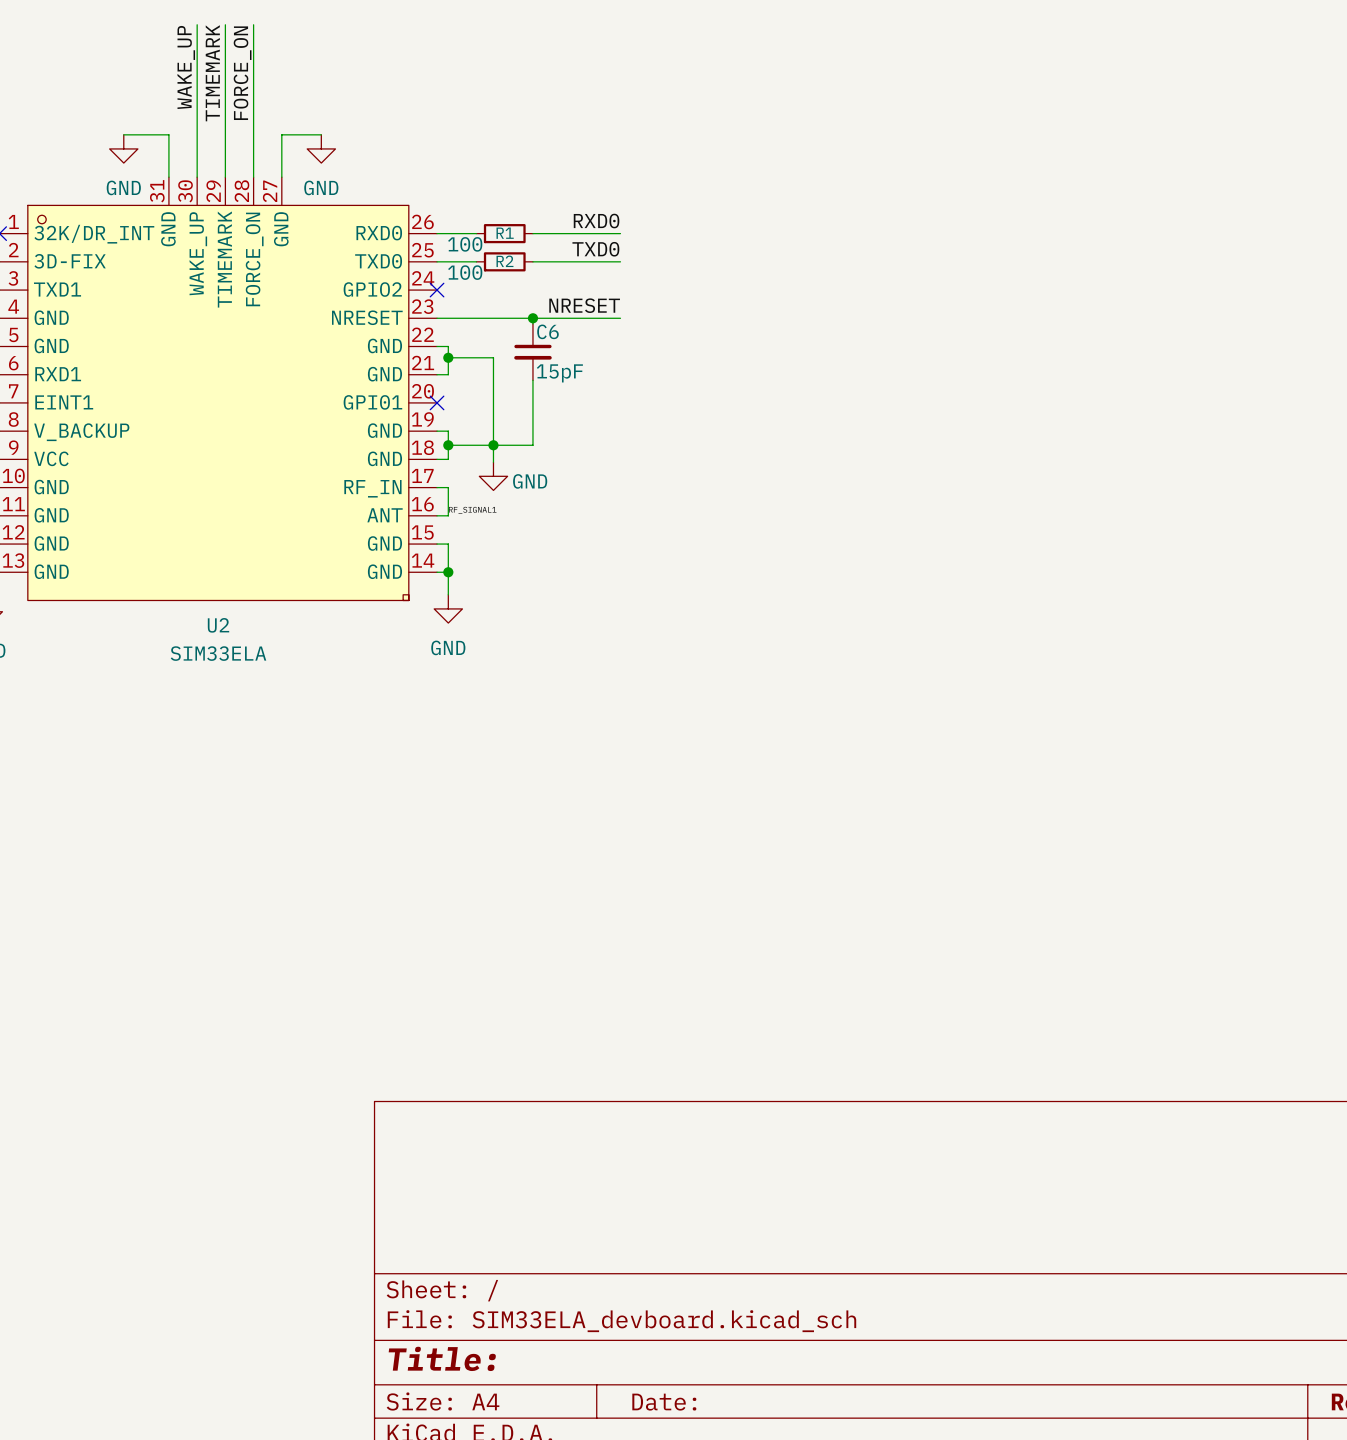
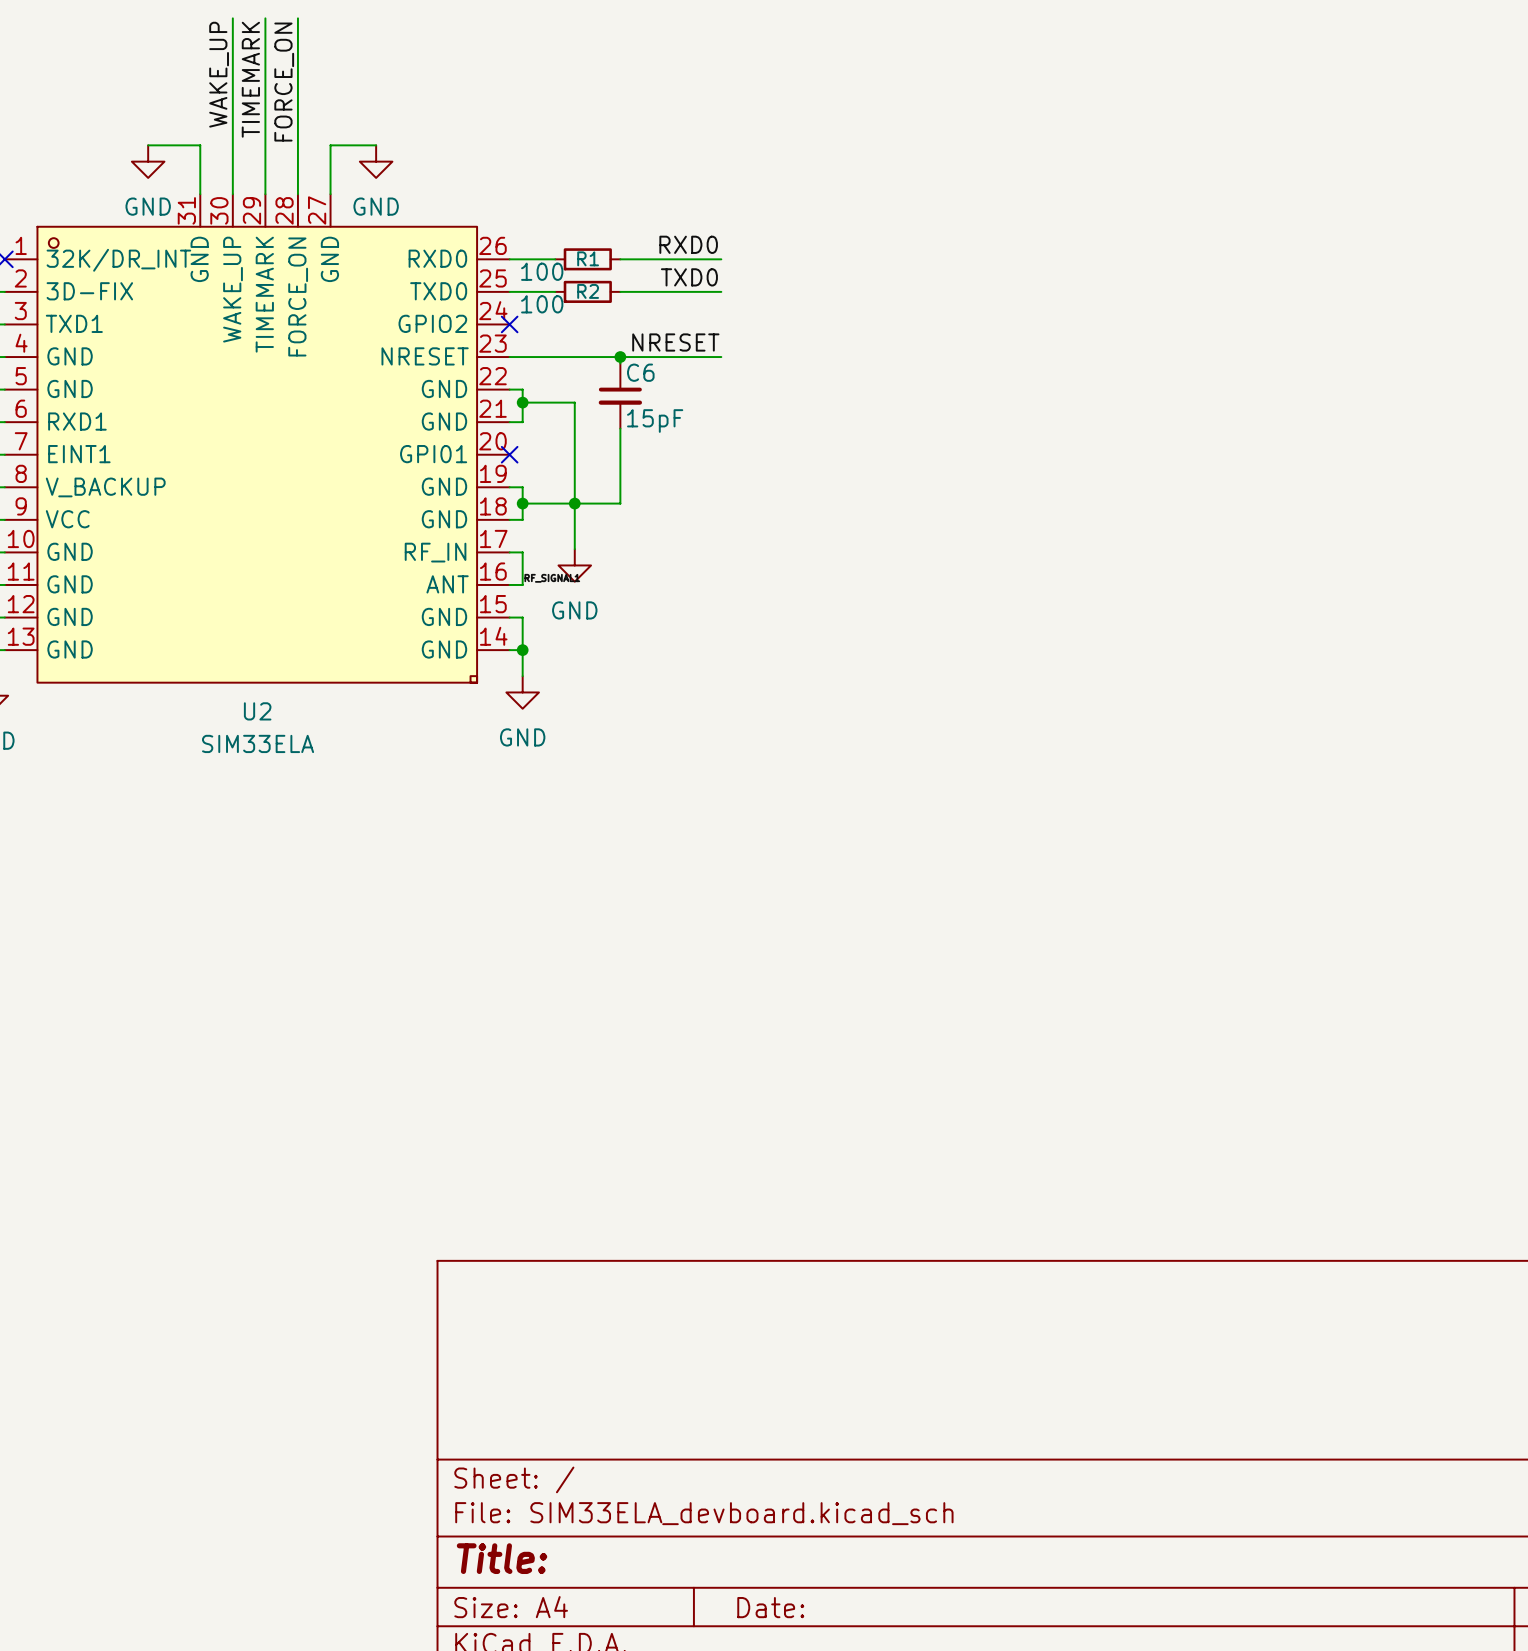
power symbol position: GND (493, 476) -> GND (574, 565)
power symbol text position: GND (530, 481) -> GND (574, 610)

